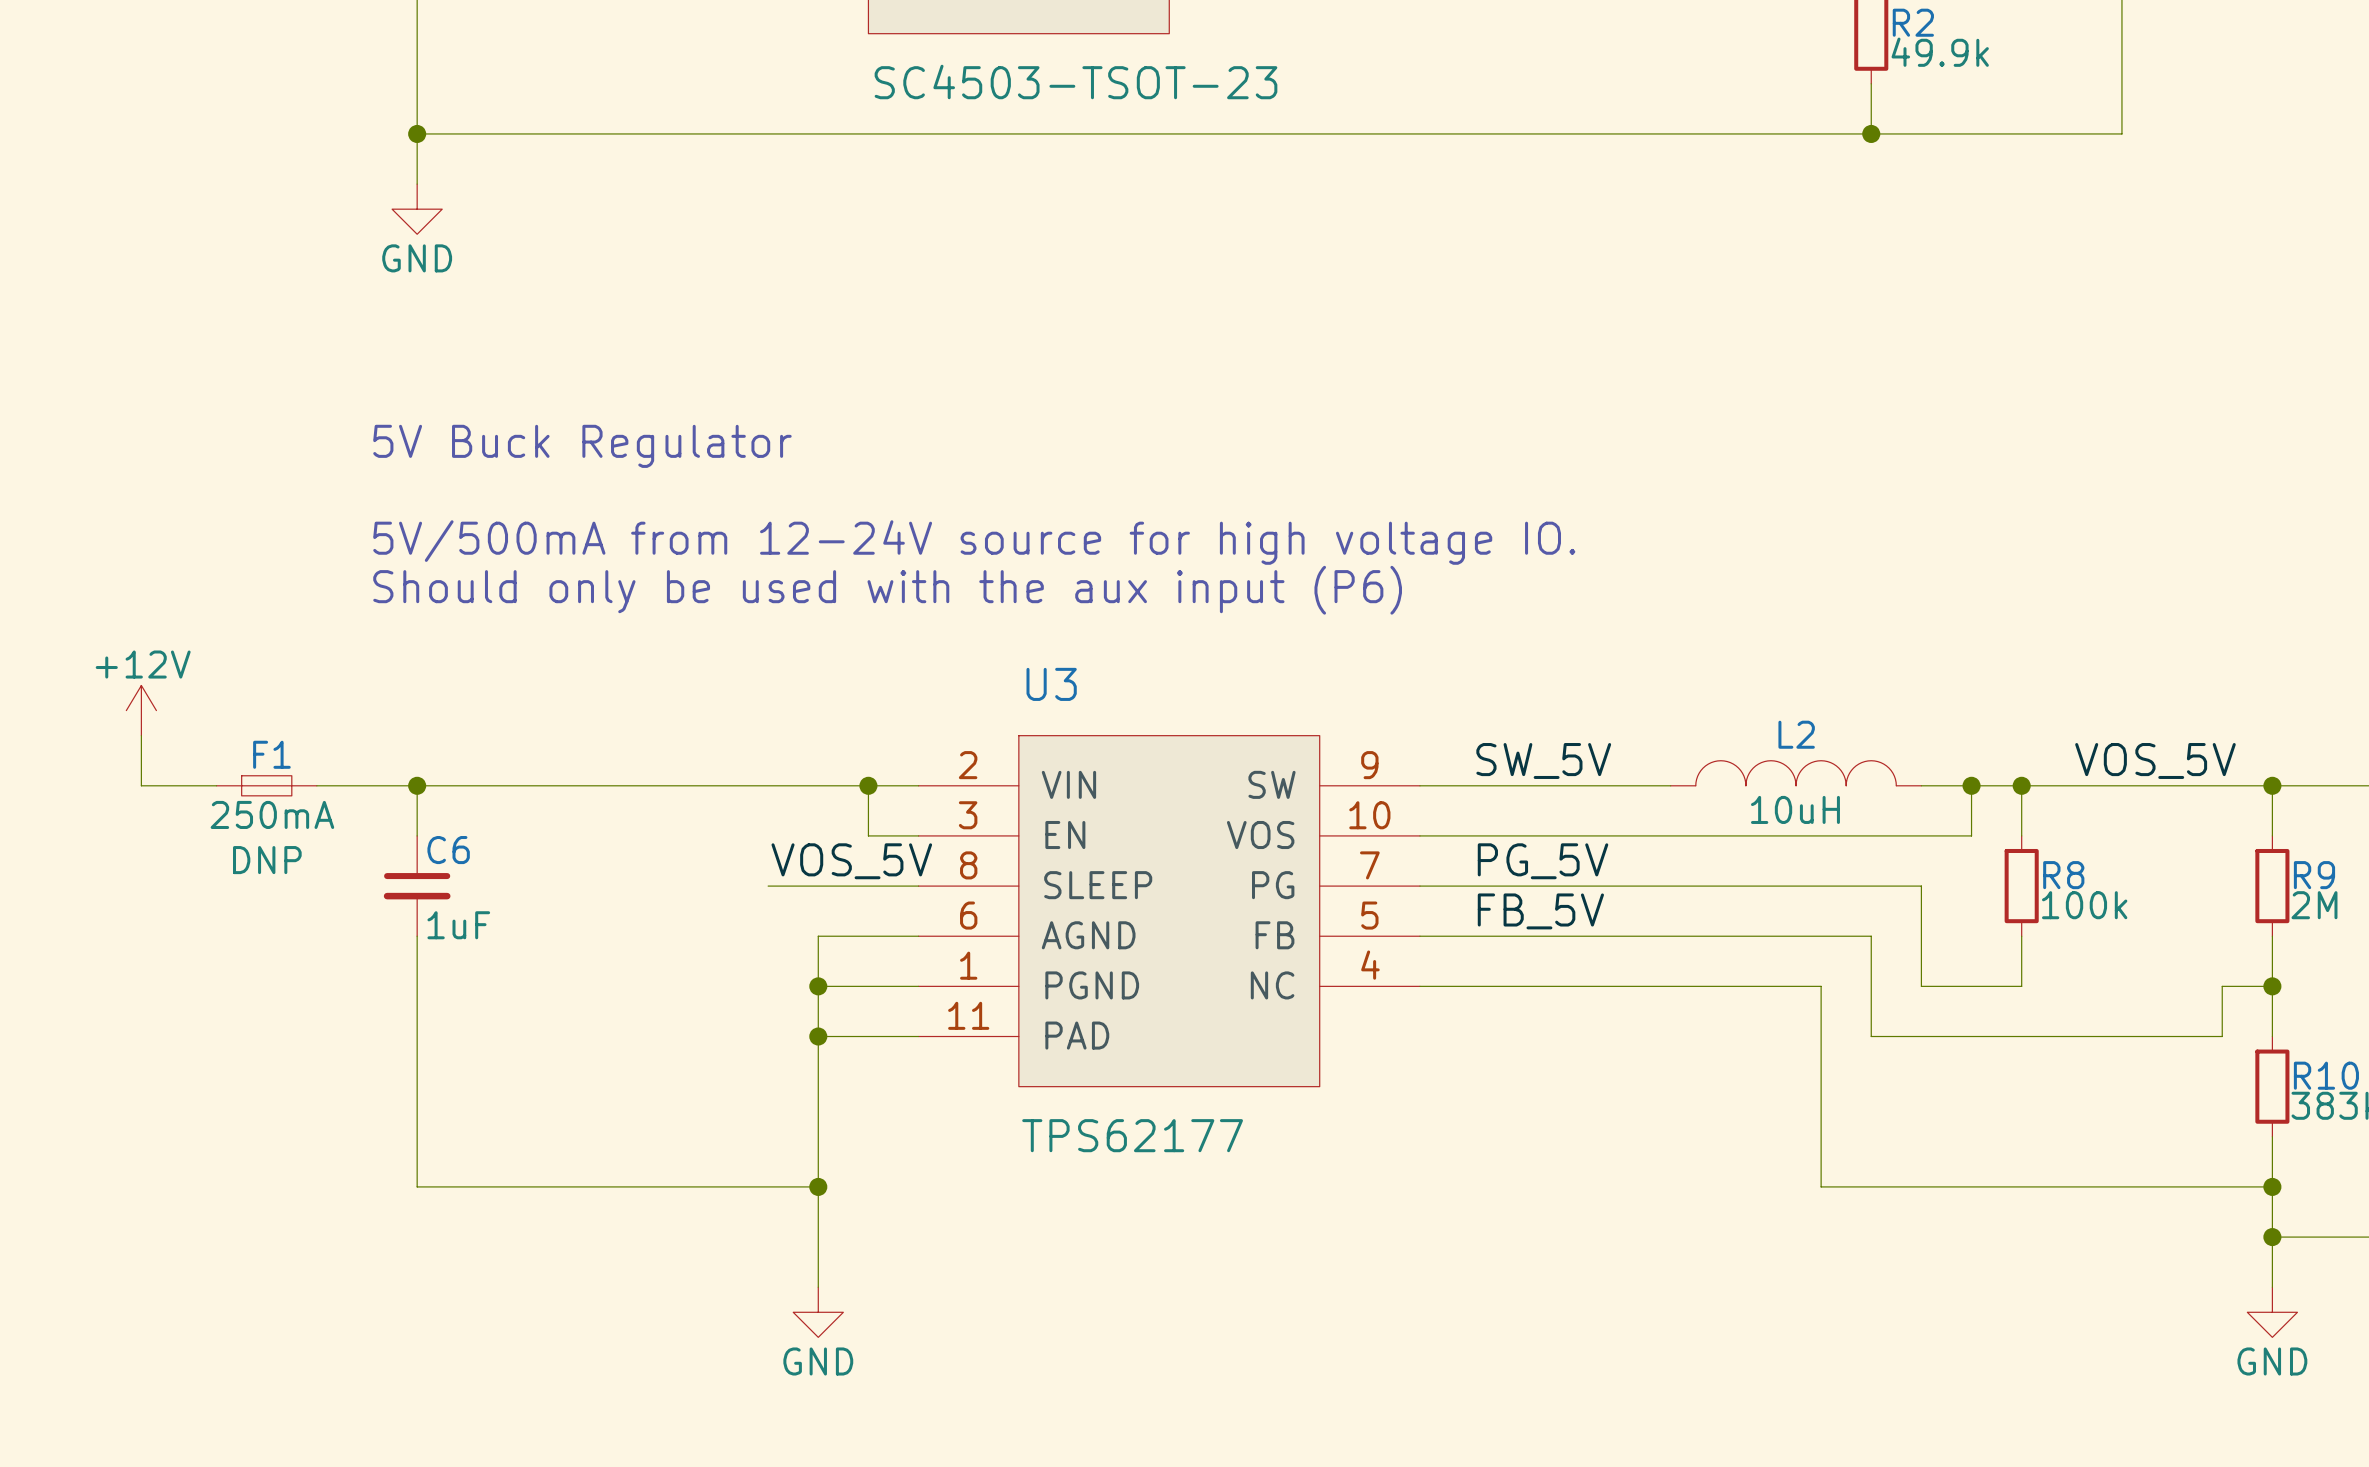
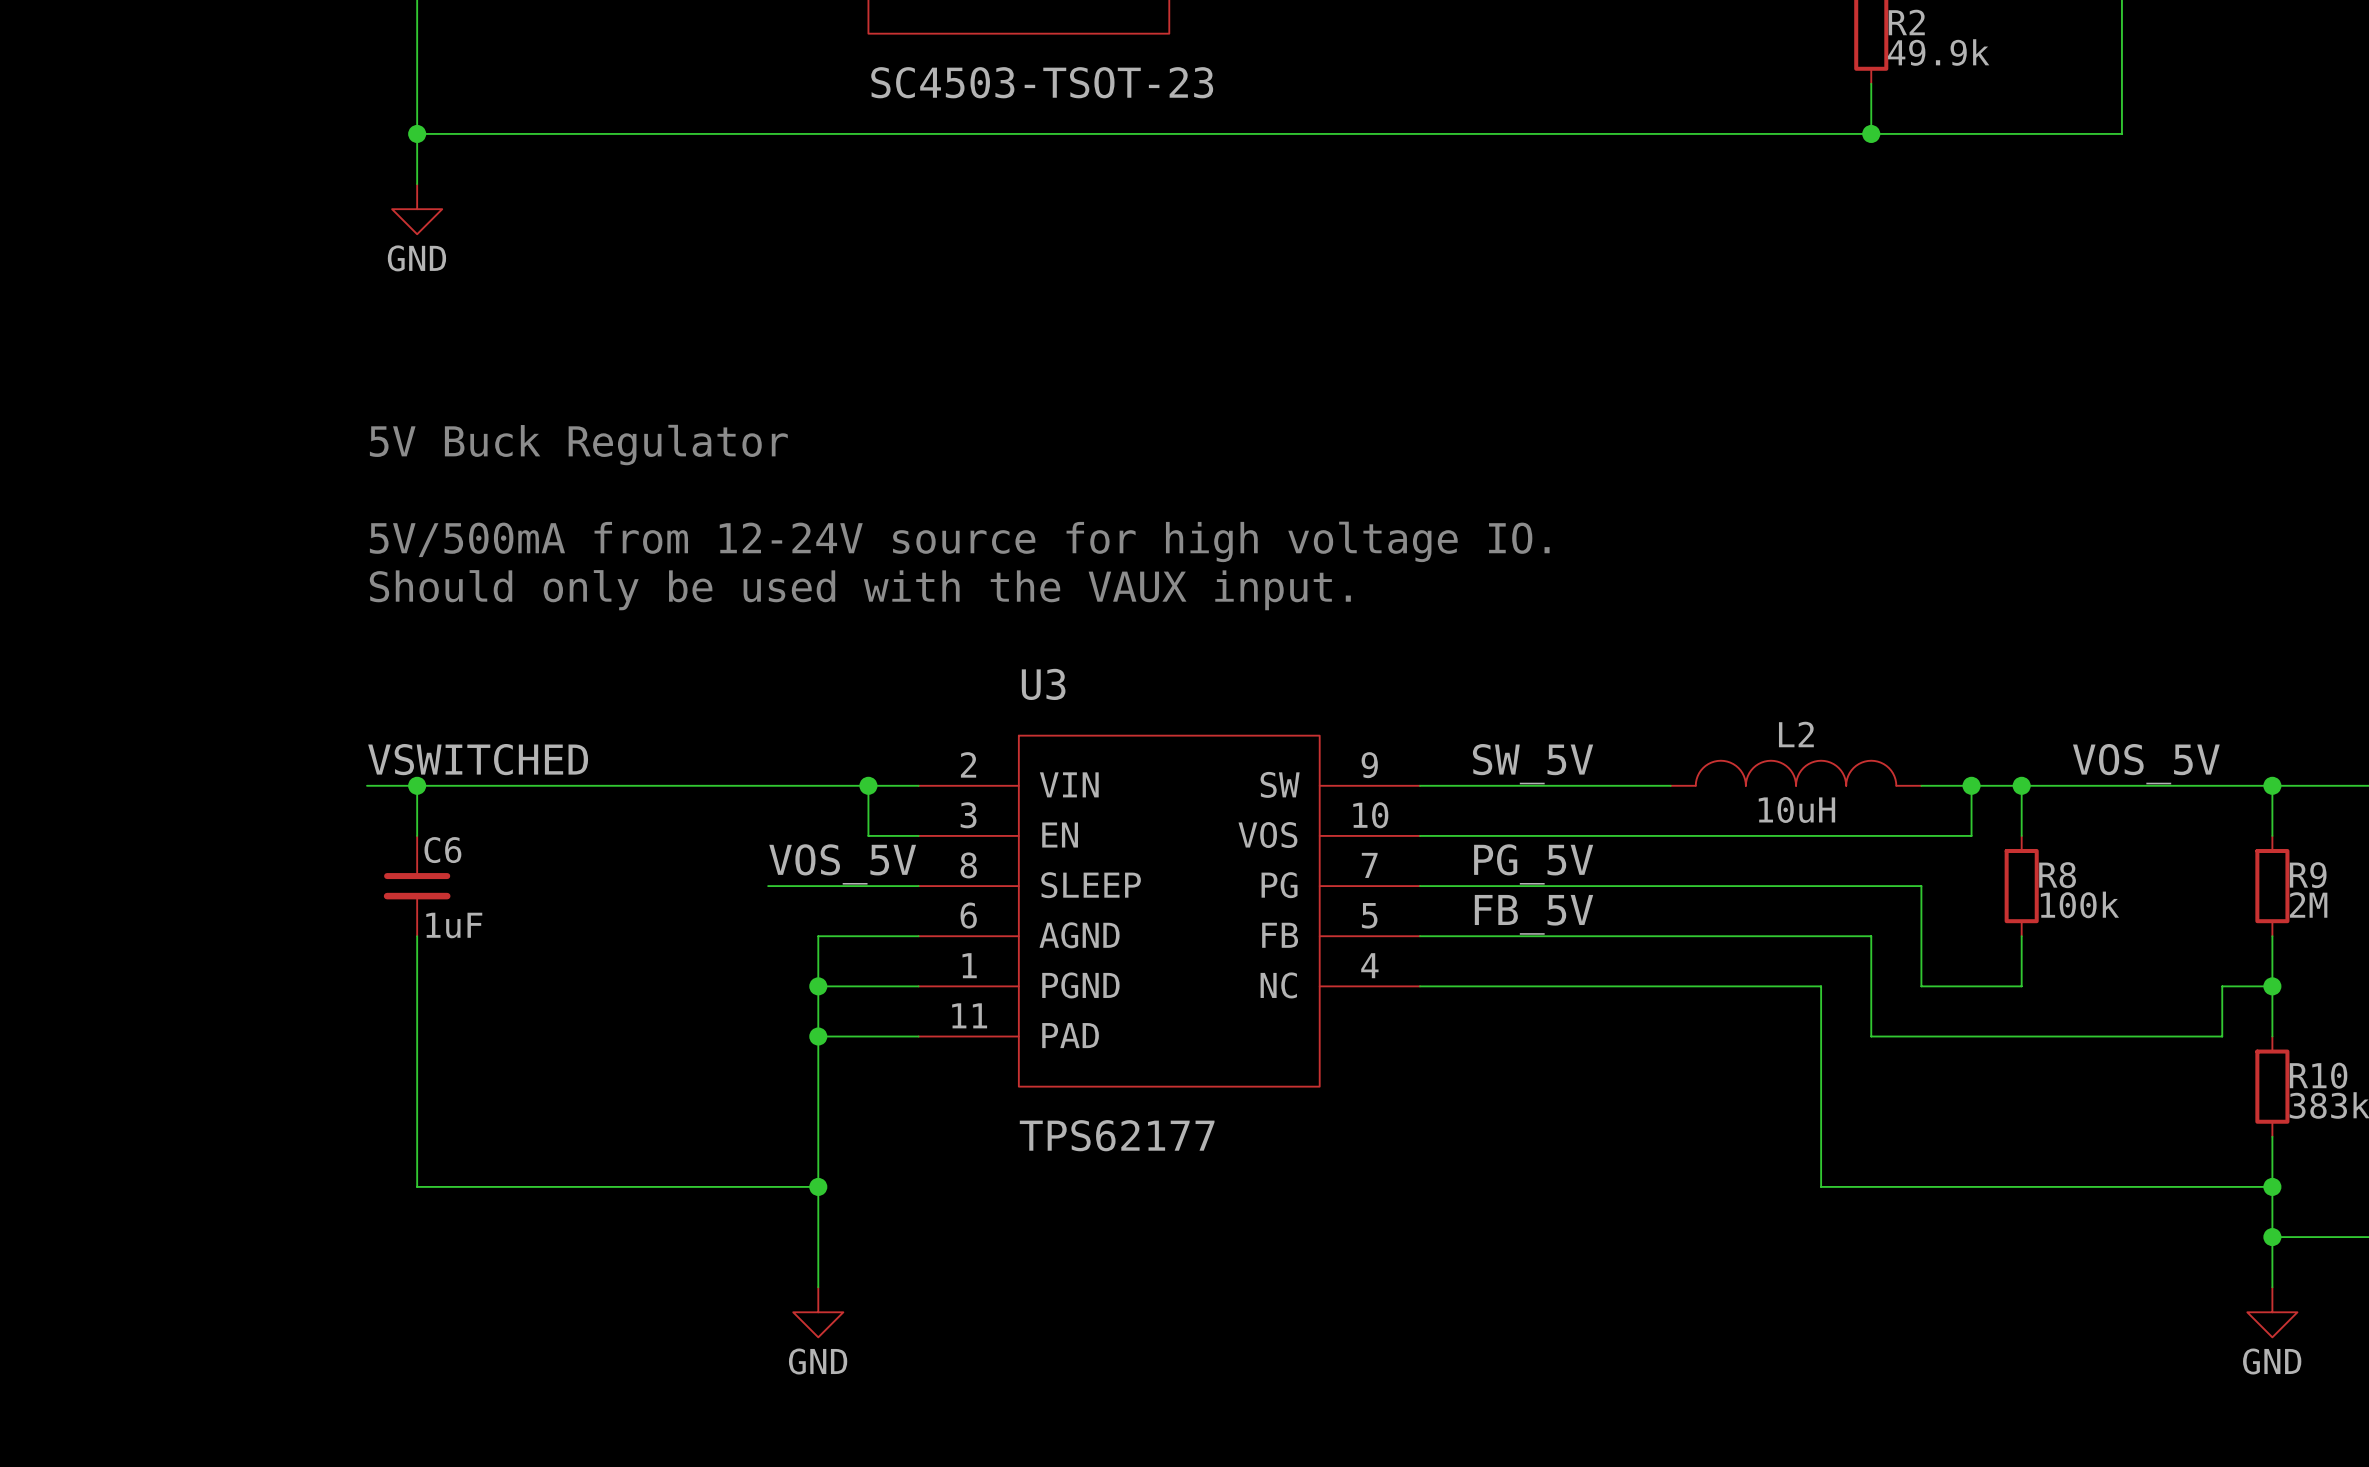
text: Should only be used with the aux input (P6) (887, 590) -> Should only be used with the VAUX input. (860, 590)
power symbol: +12V (141, 710) -> none
wire: (141, 735) (141, 785) (216, 785) -> none
label: none -> VSWITCHED (478, 759)
F1: 250mA (266, 785) -> none
wire: (316, 785) (367, 785) -> none

